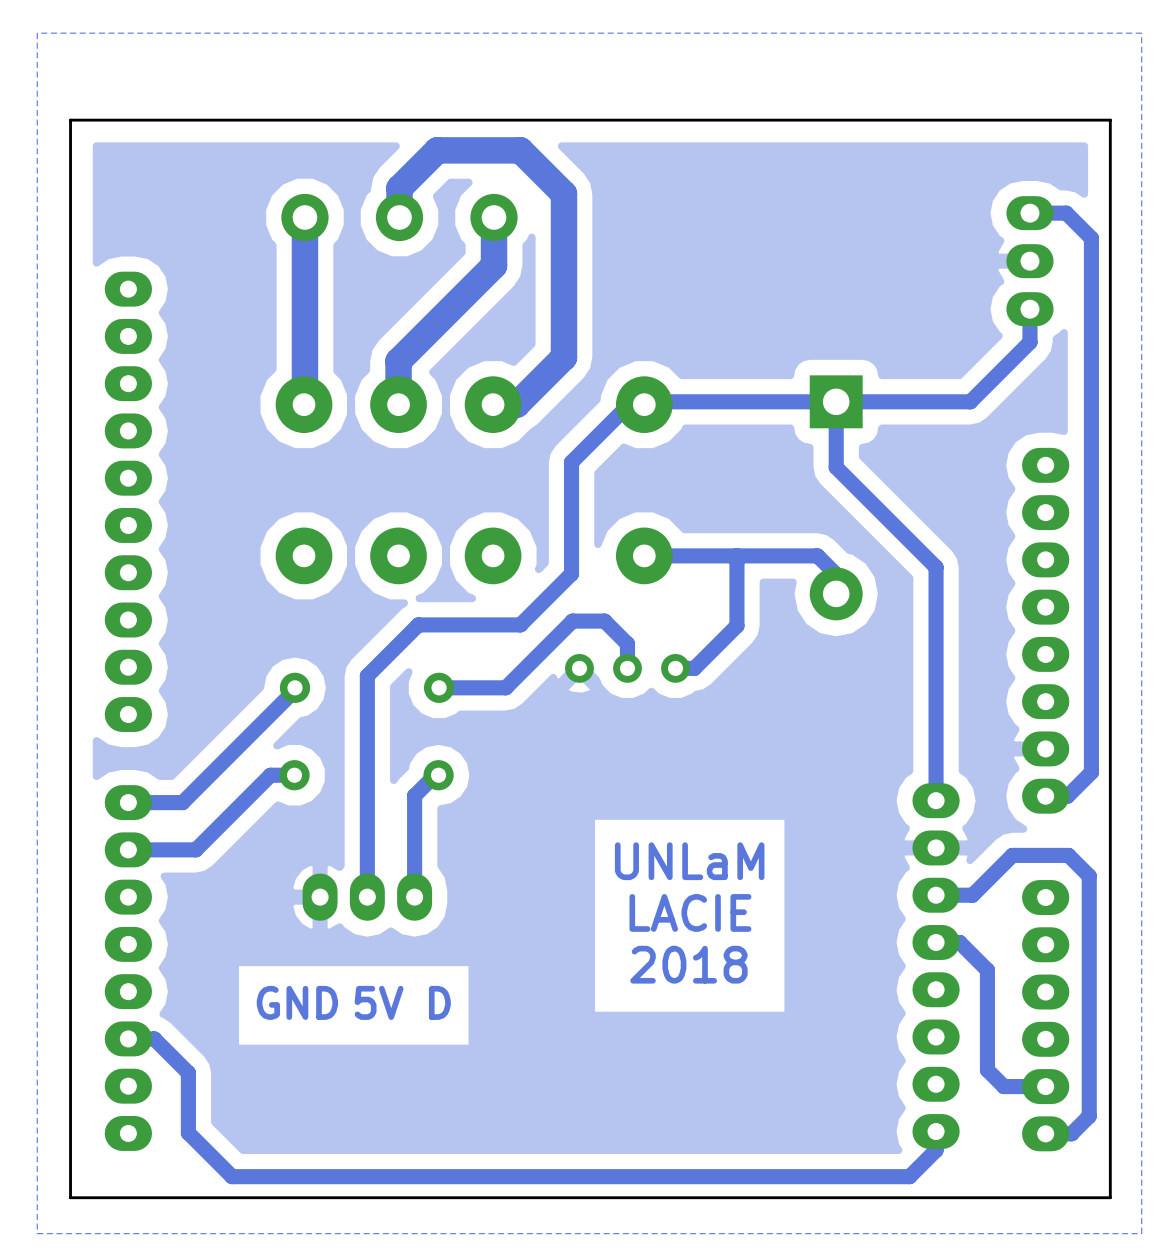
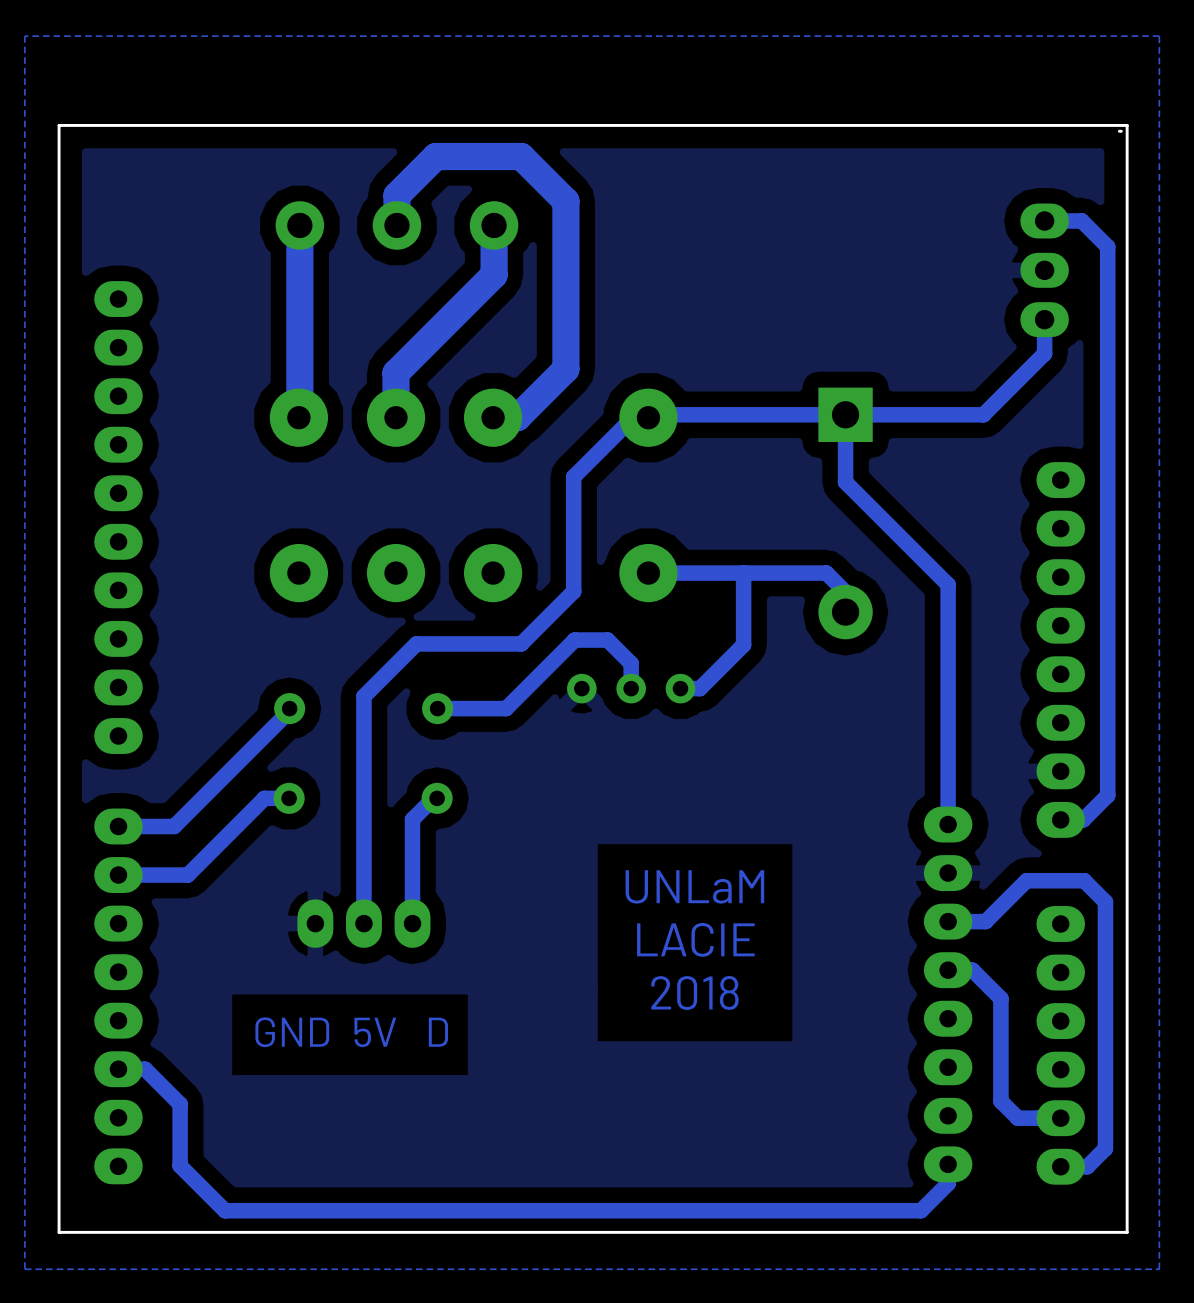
board edge: none -> (1121, 131) (1119, 131)

